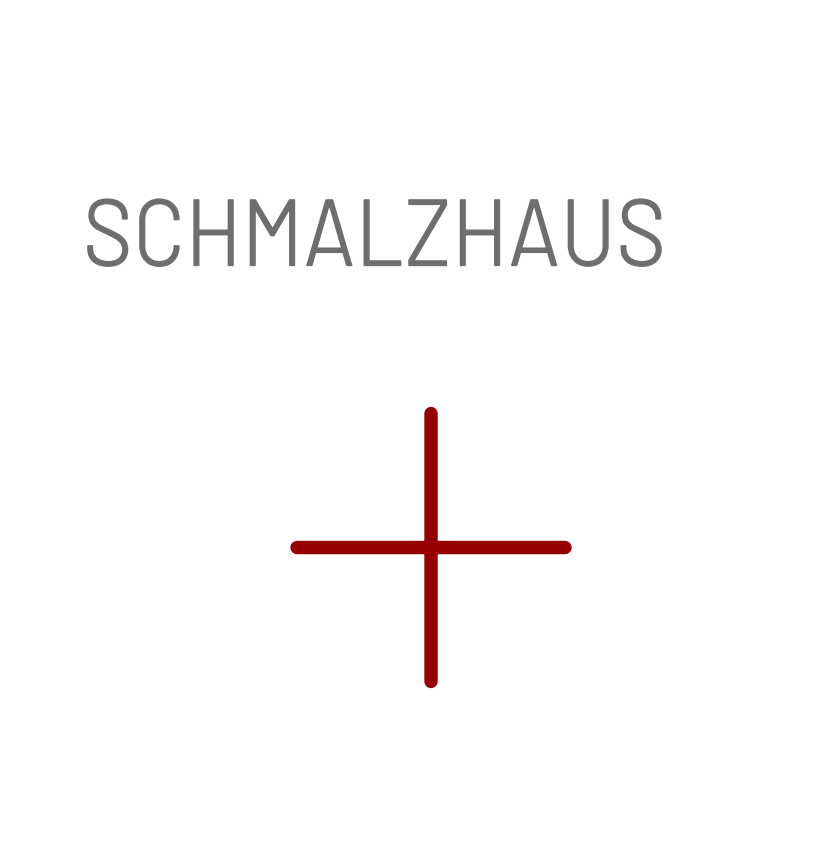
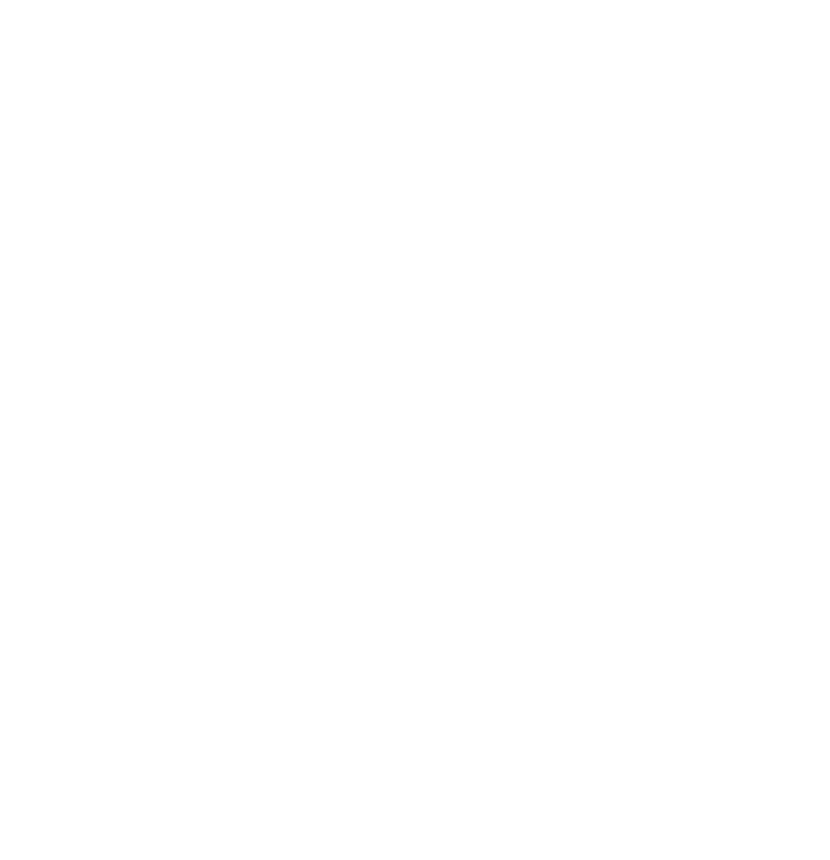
part: (431, 547) -> none

